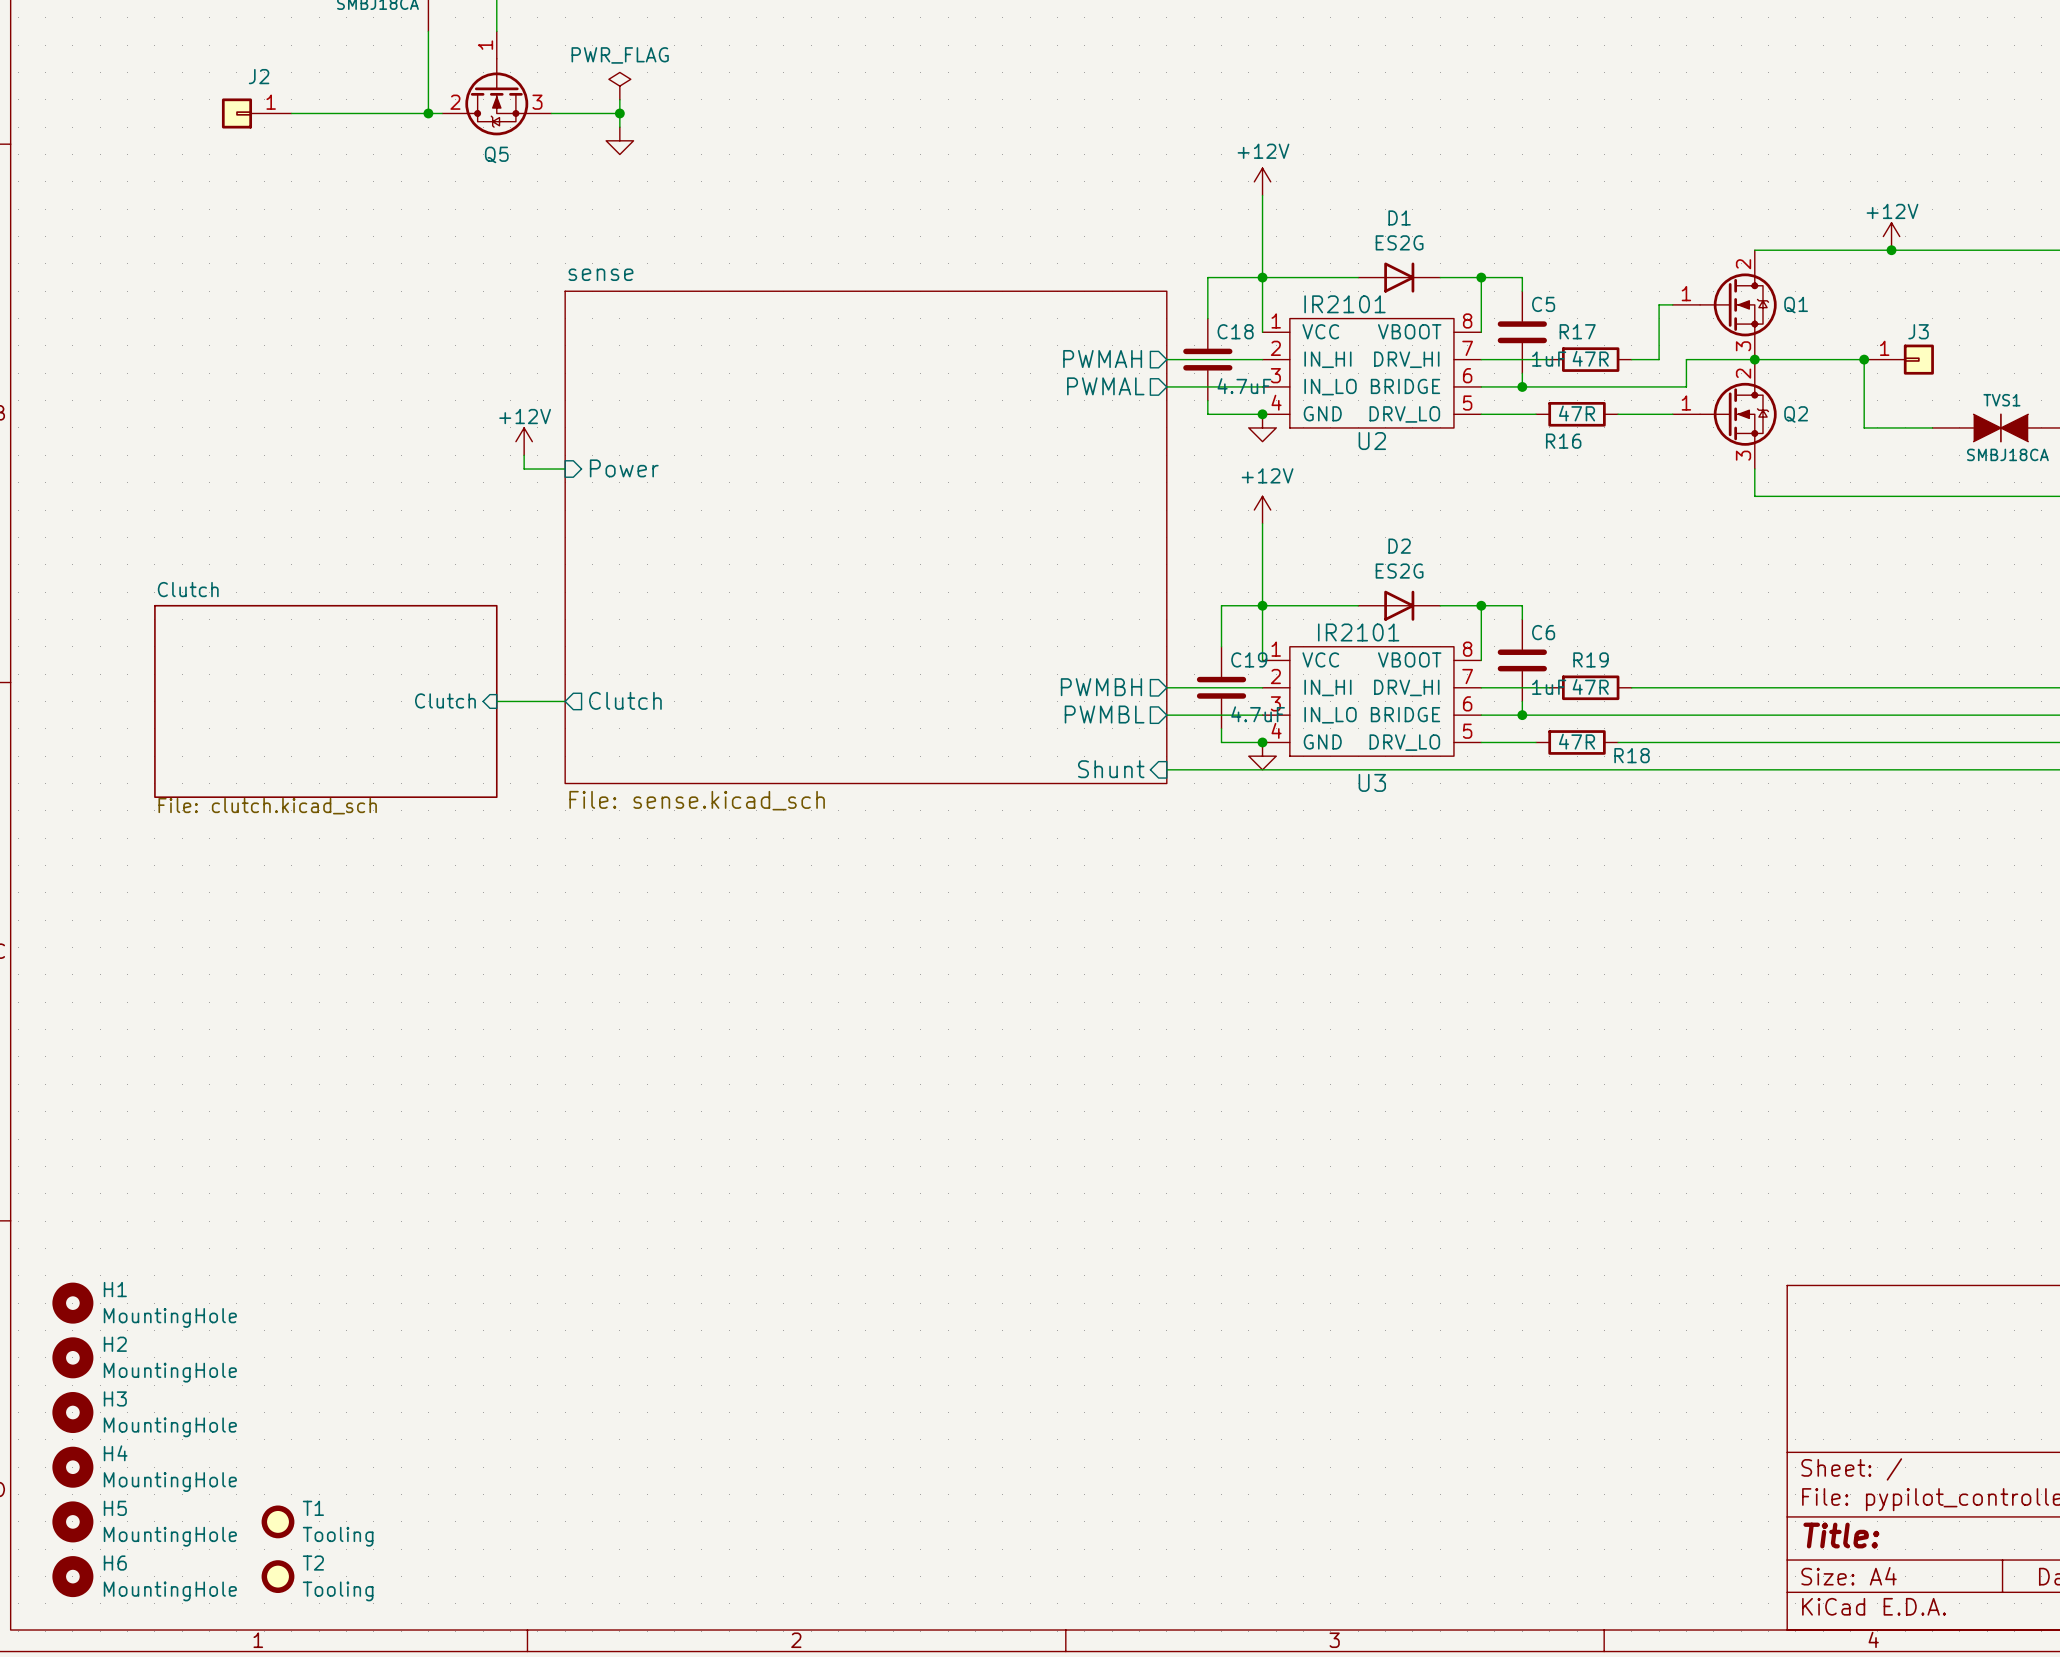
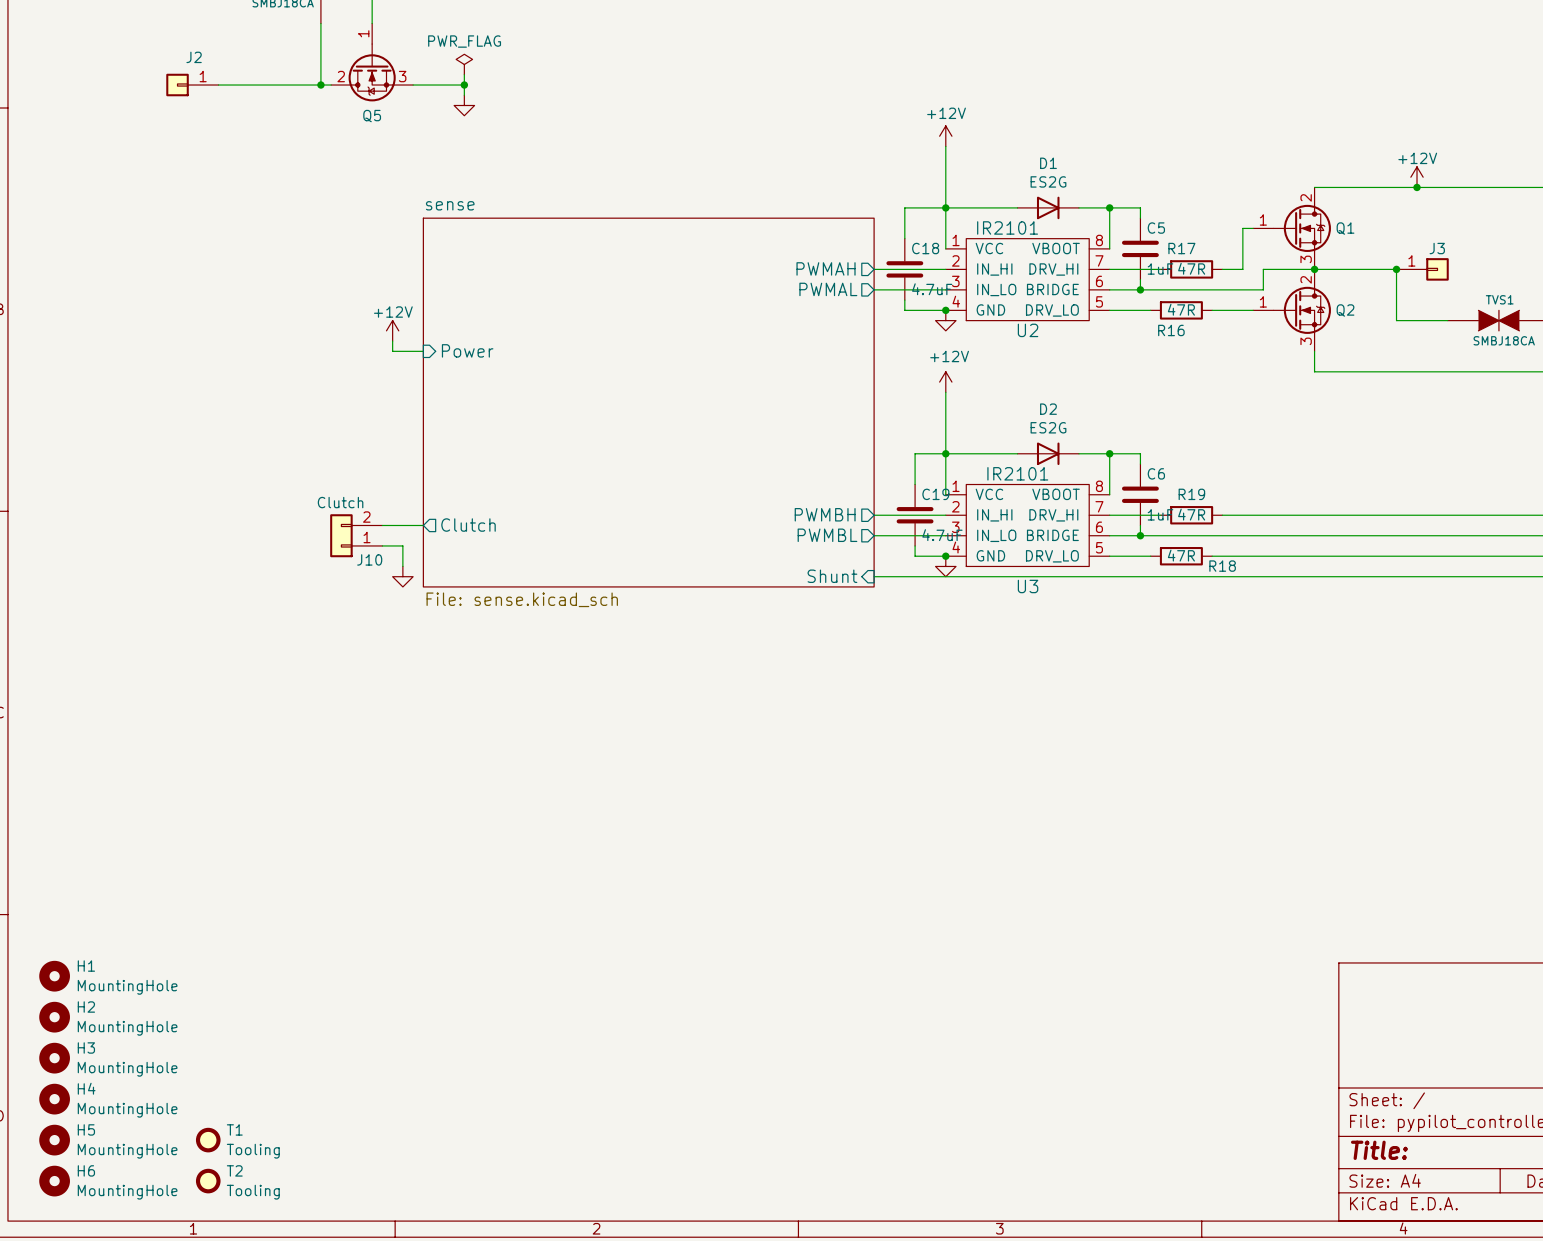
sheet pin: Clutch (445, 700) -> none
sheet Clutch: File: clutch.kicad_sch (325, 701) -> none
J10: none -> Clutch (356, 535)
wire: none -> (382, 545) (402, 545) (402, 566)
power symbol: none -> (402, 576)

